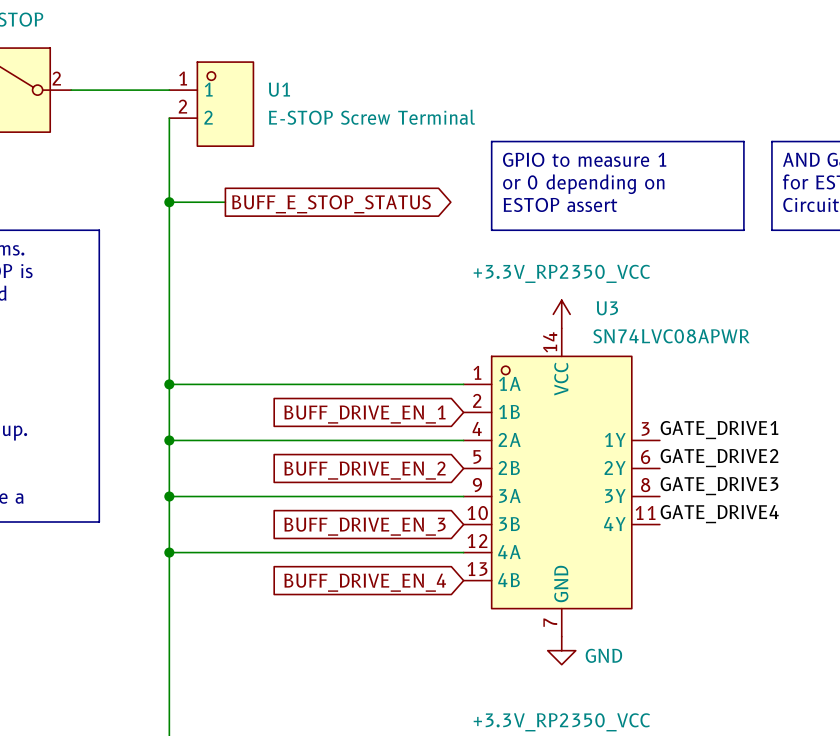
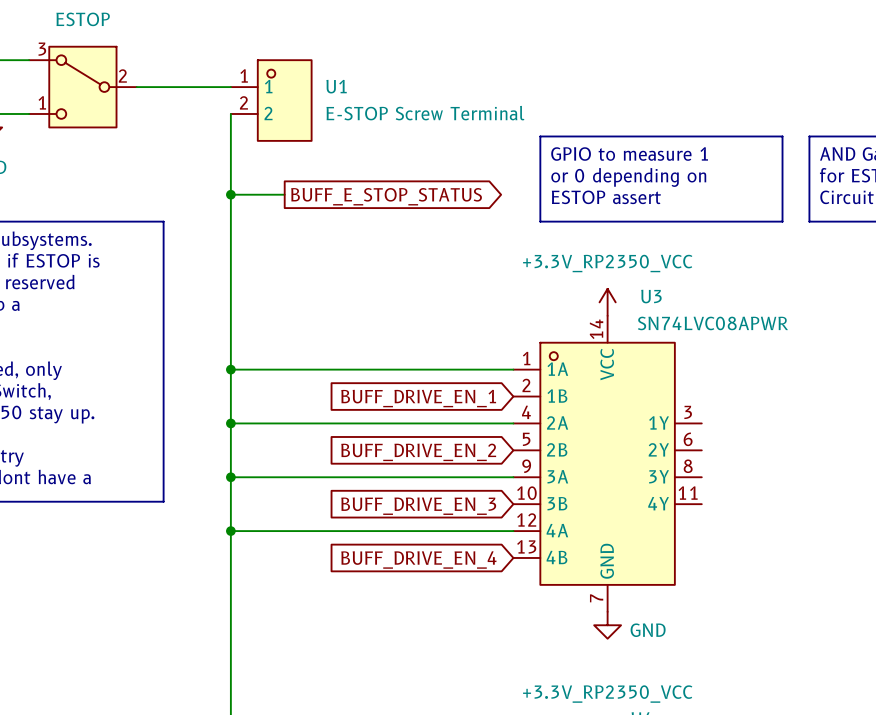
label: GATE_DRIVE1 (719, 430) -> none
label: GATE_DRIVE2 (719, 458) -> none
label: GATE_DRIVE3 (719, 486) -> none
label: GATE_DRIVE4 (719, 514) -> none

